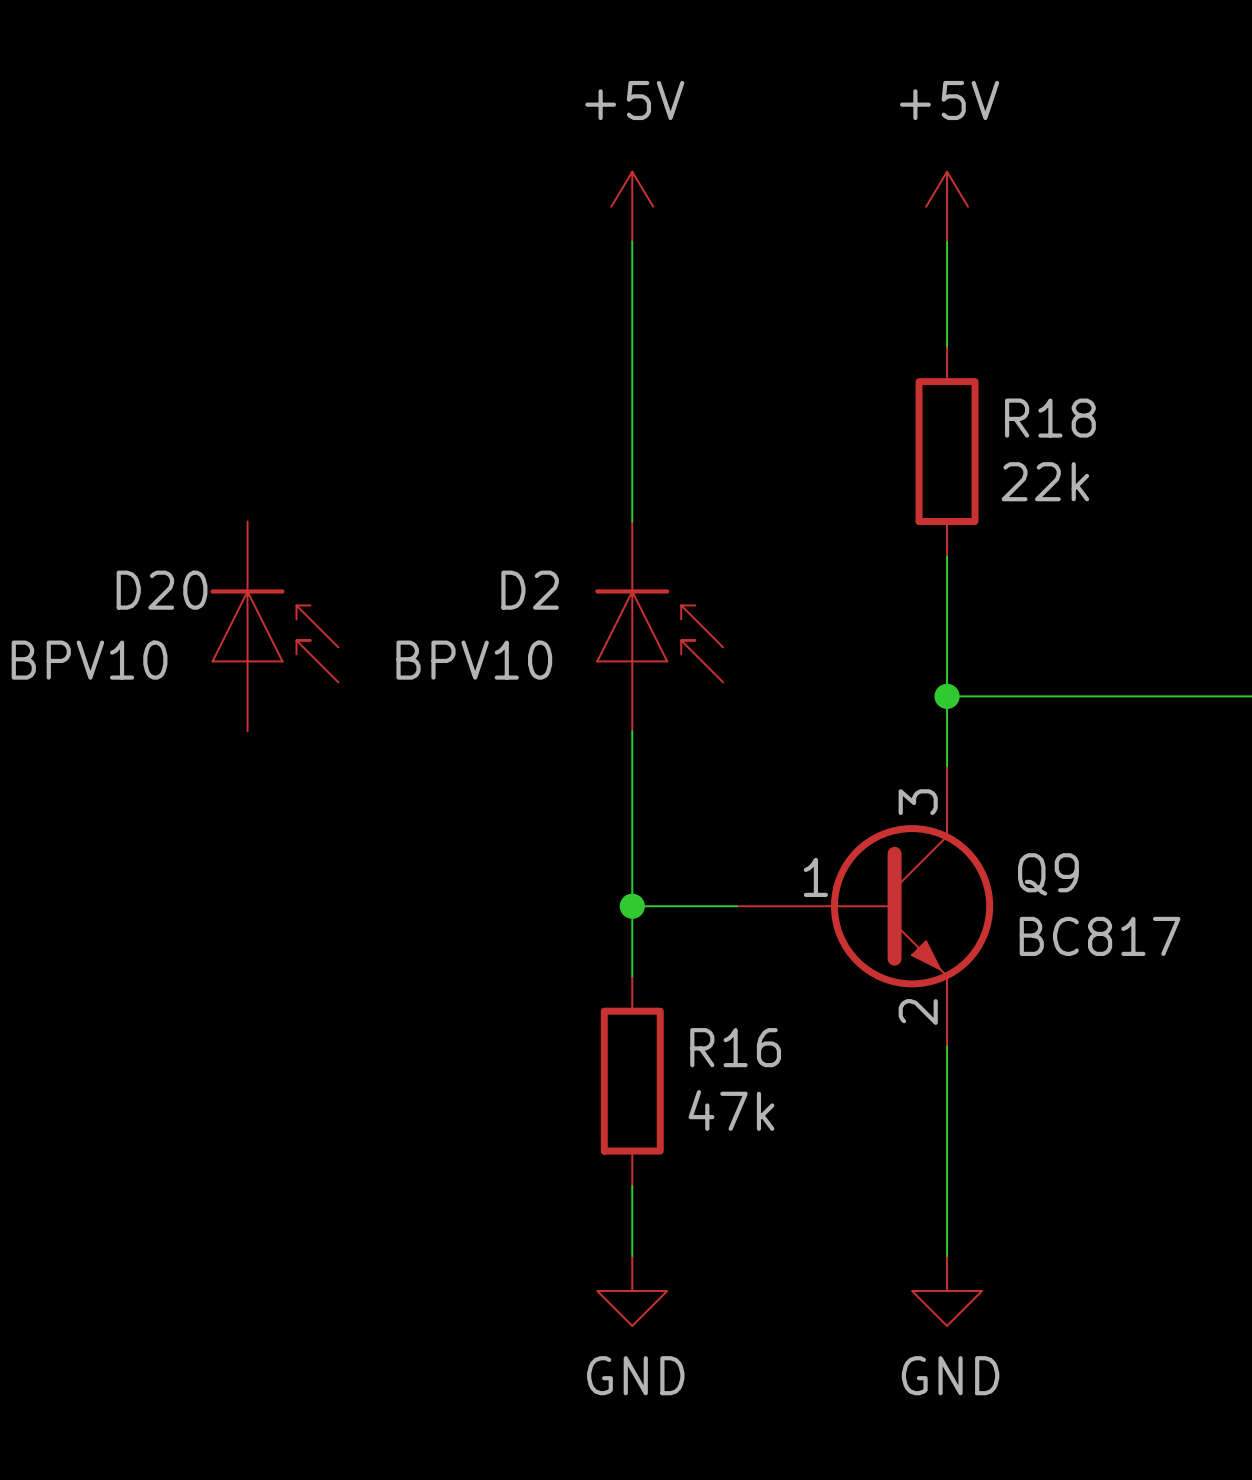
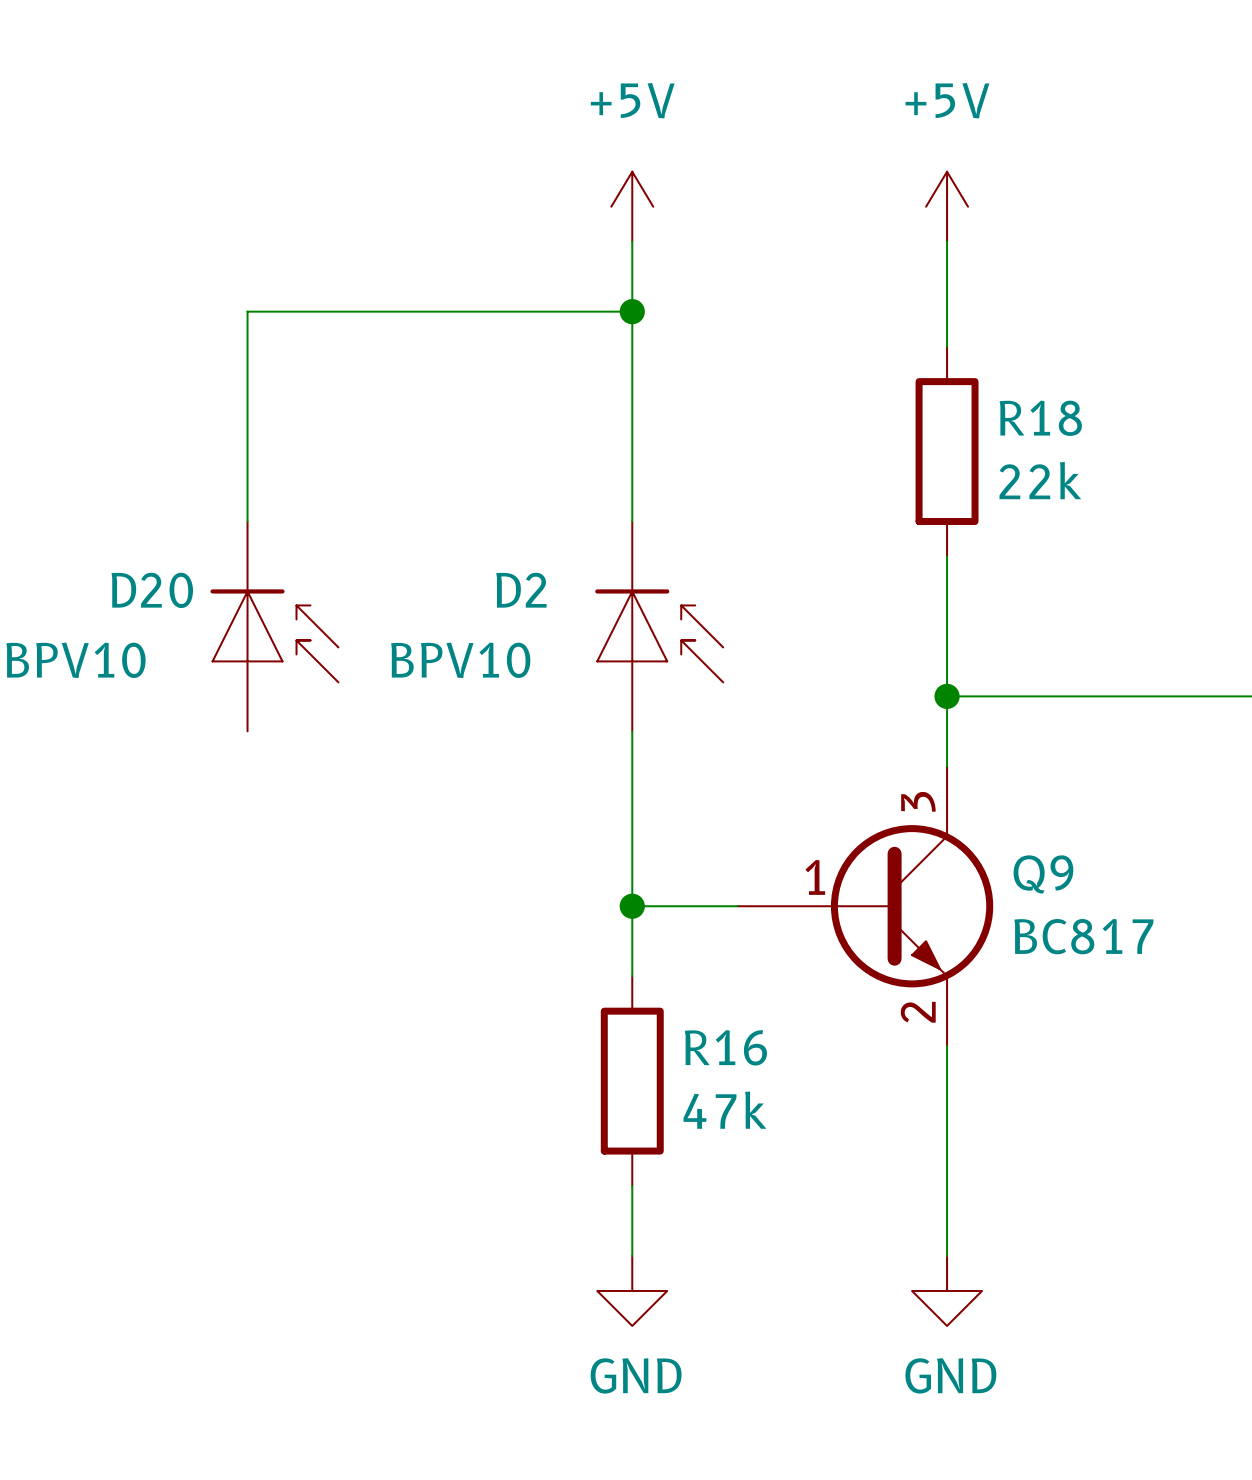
wire: none -> (632, 311) (247, 311) (247, 521)
junction: none -> (632, 311)

